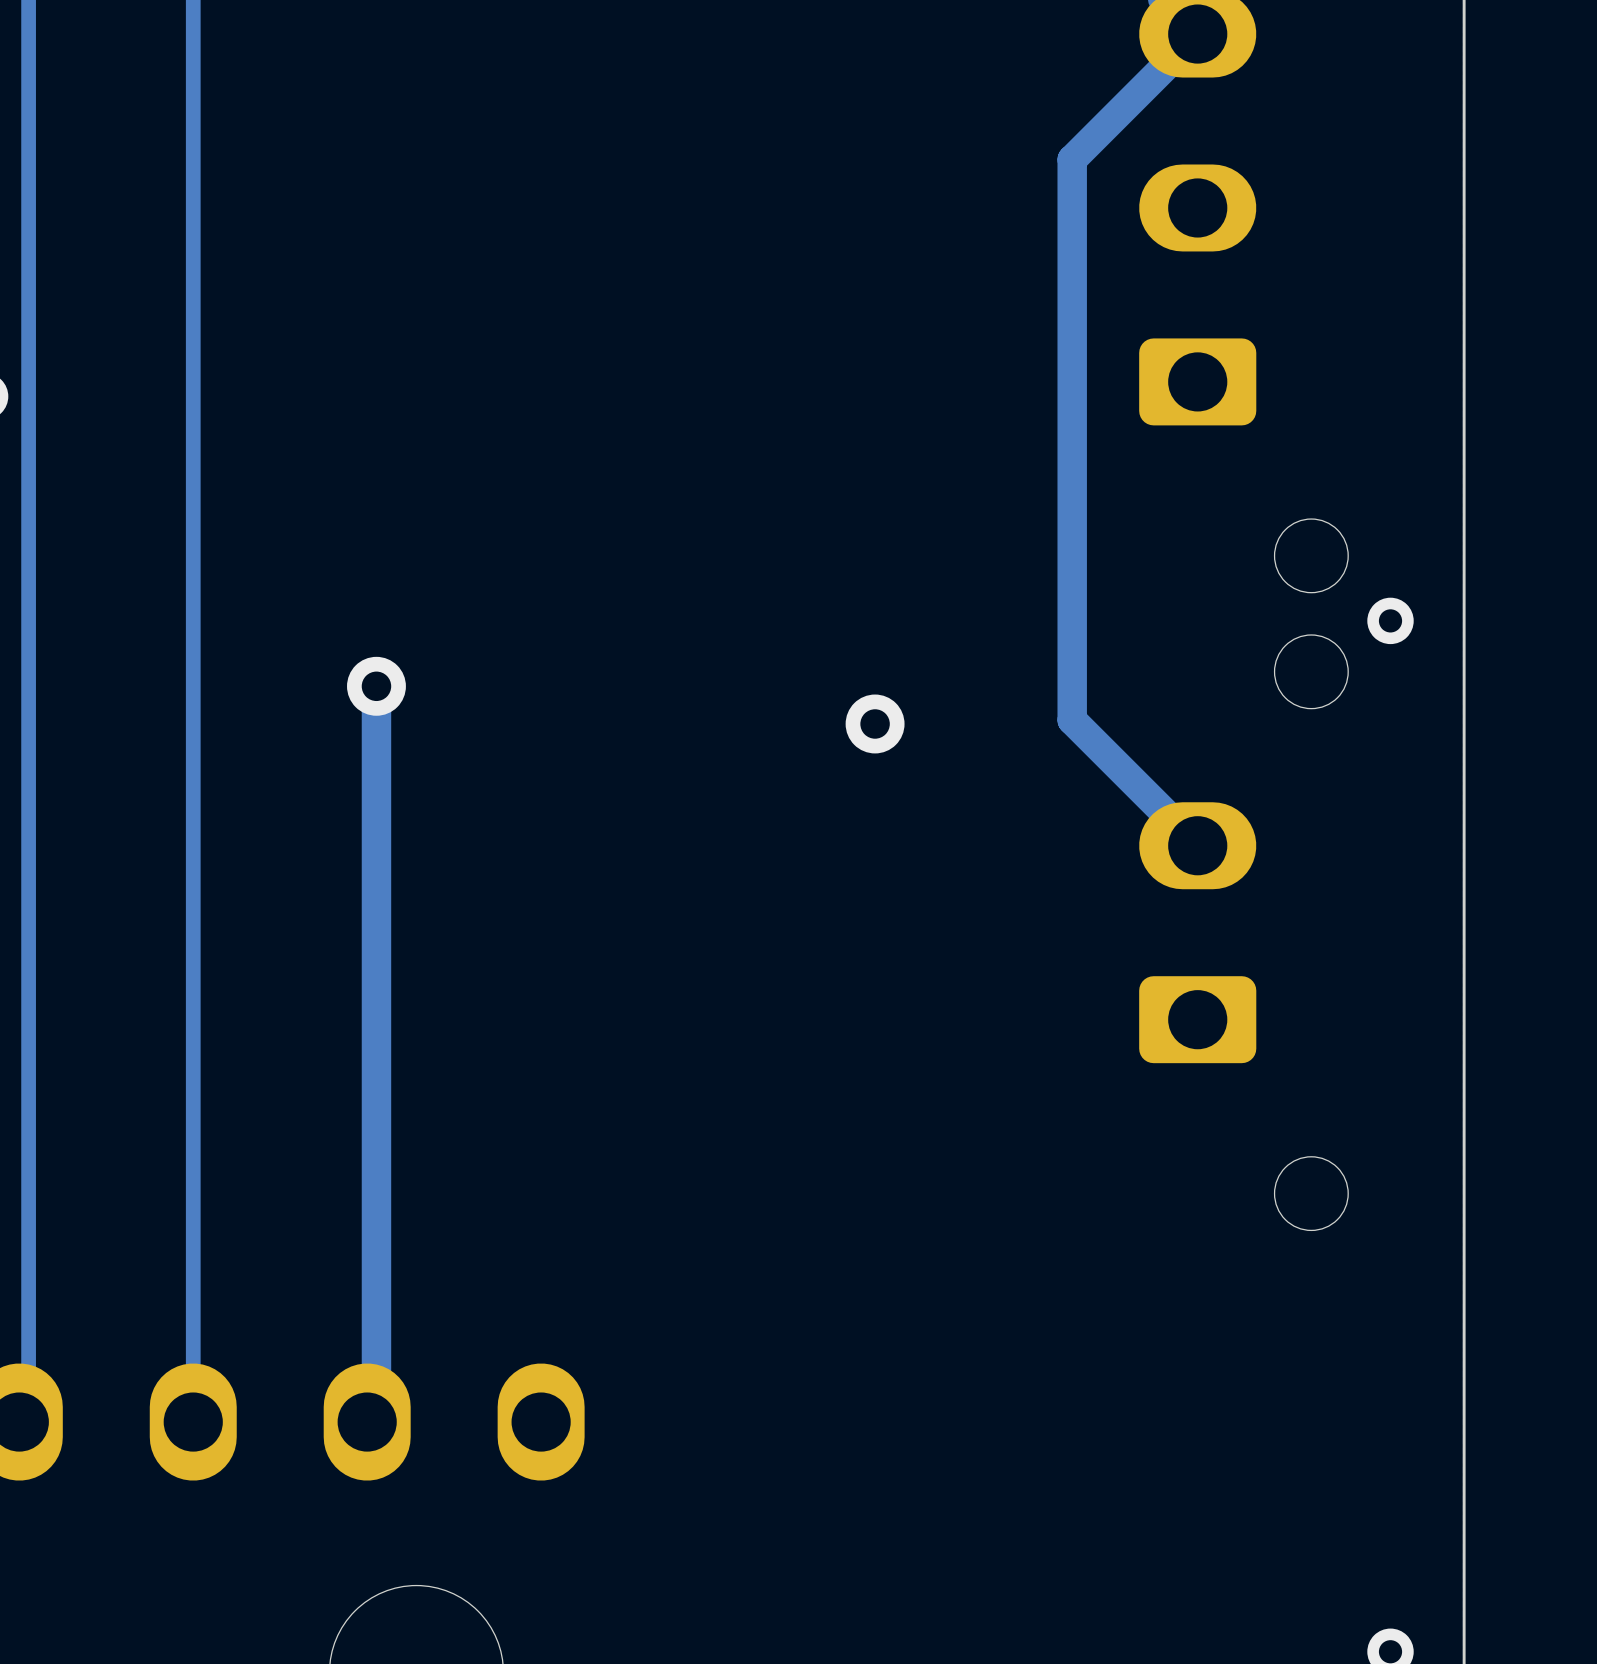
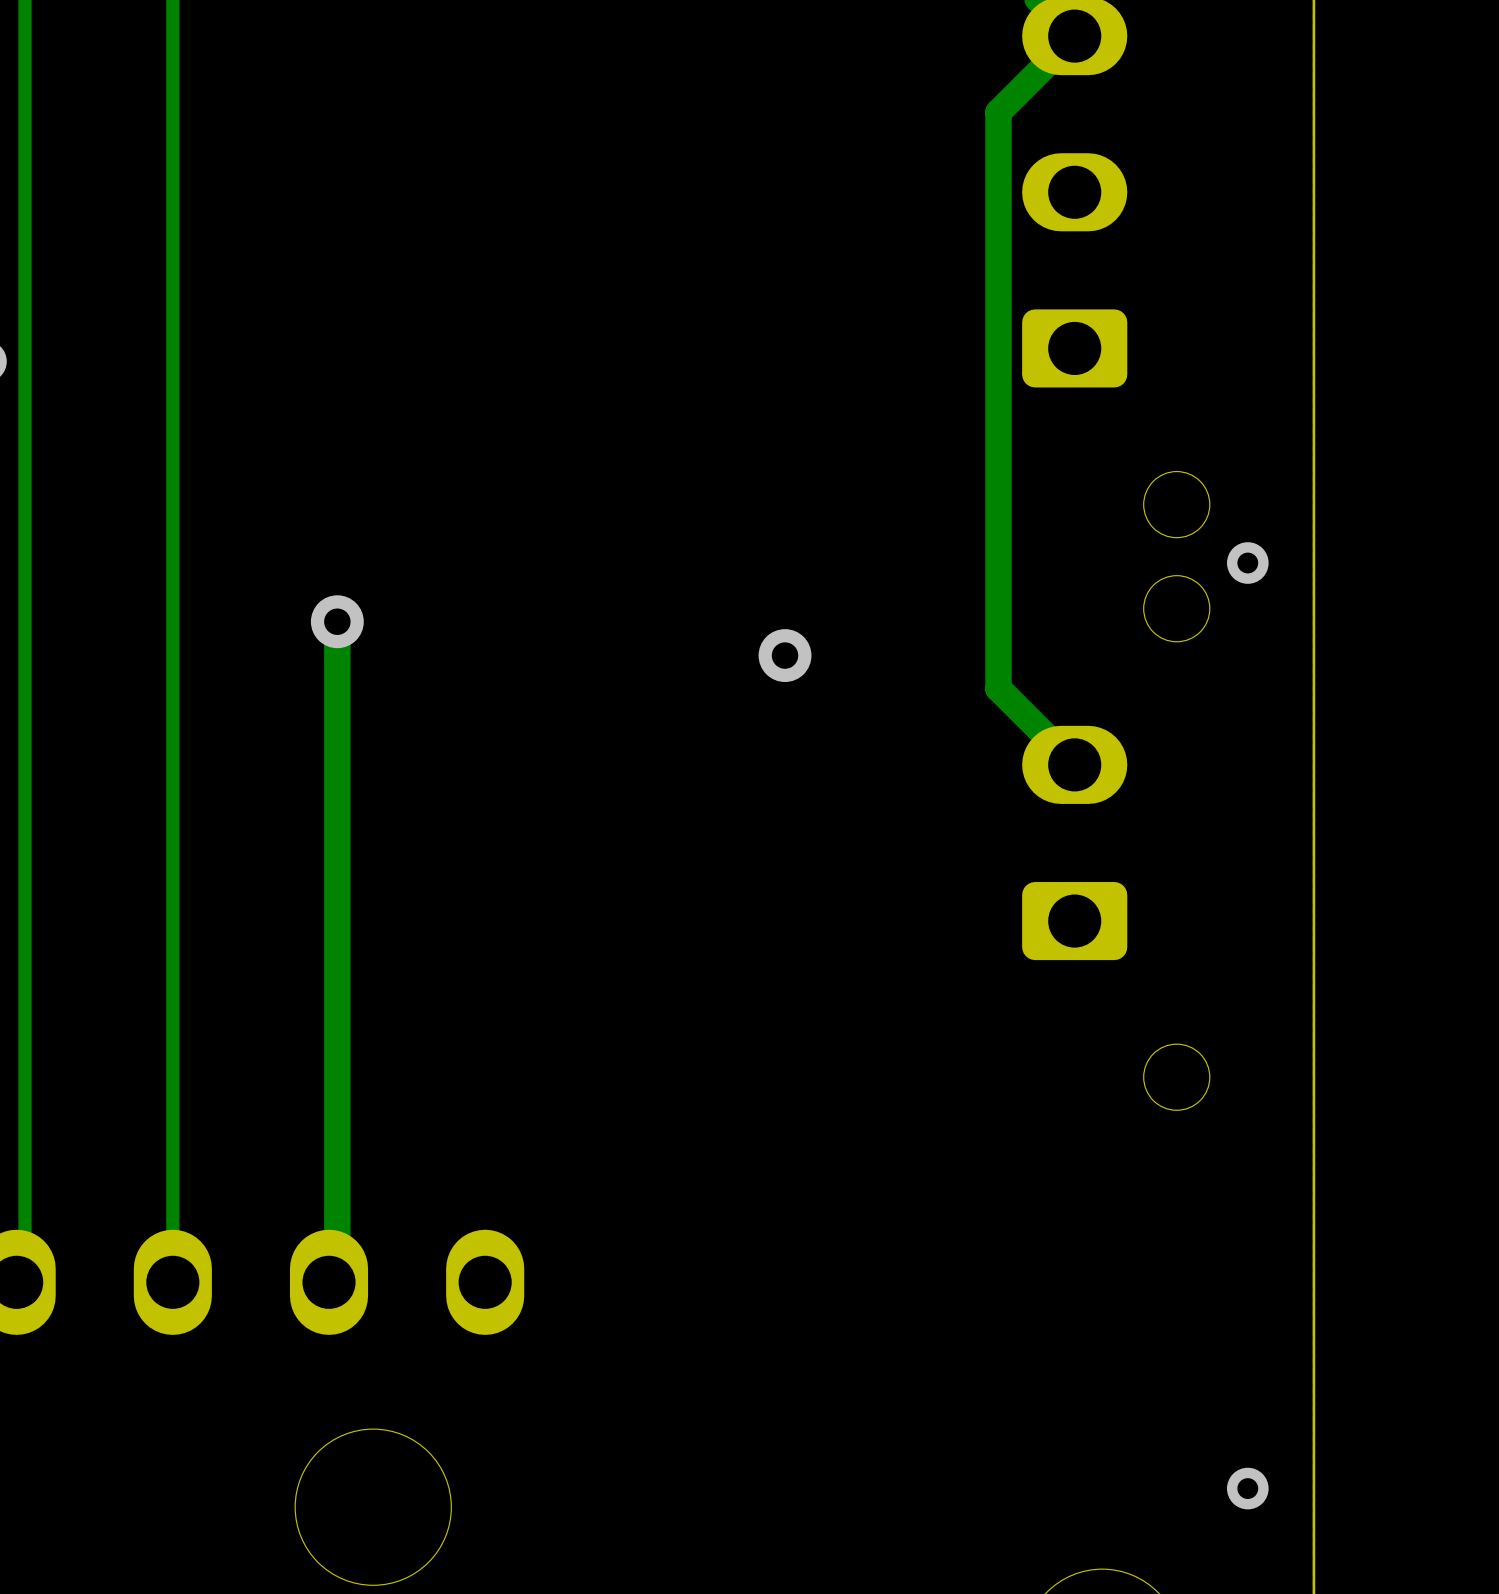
track: (1112, 118) (1072, 159) (1072, 720) (1112, 760) -> (998, 112) (998, 688)

